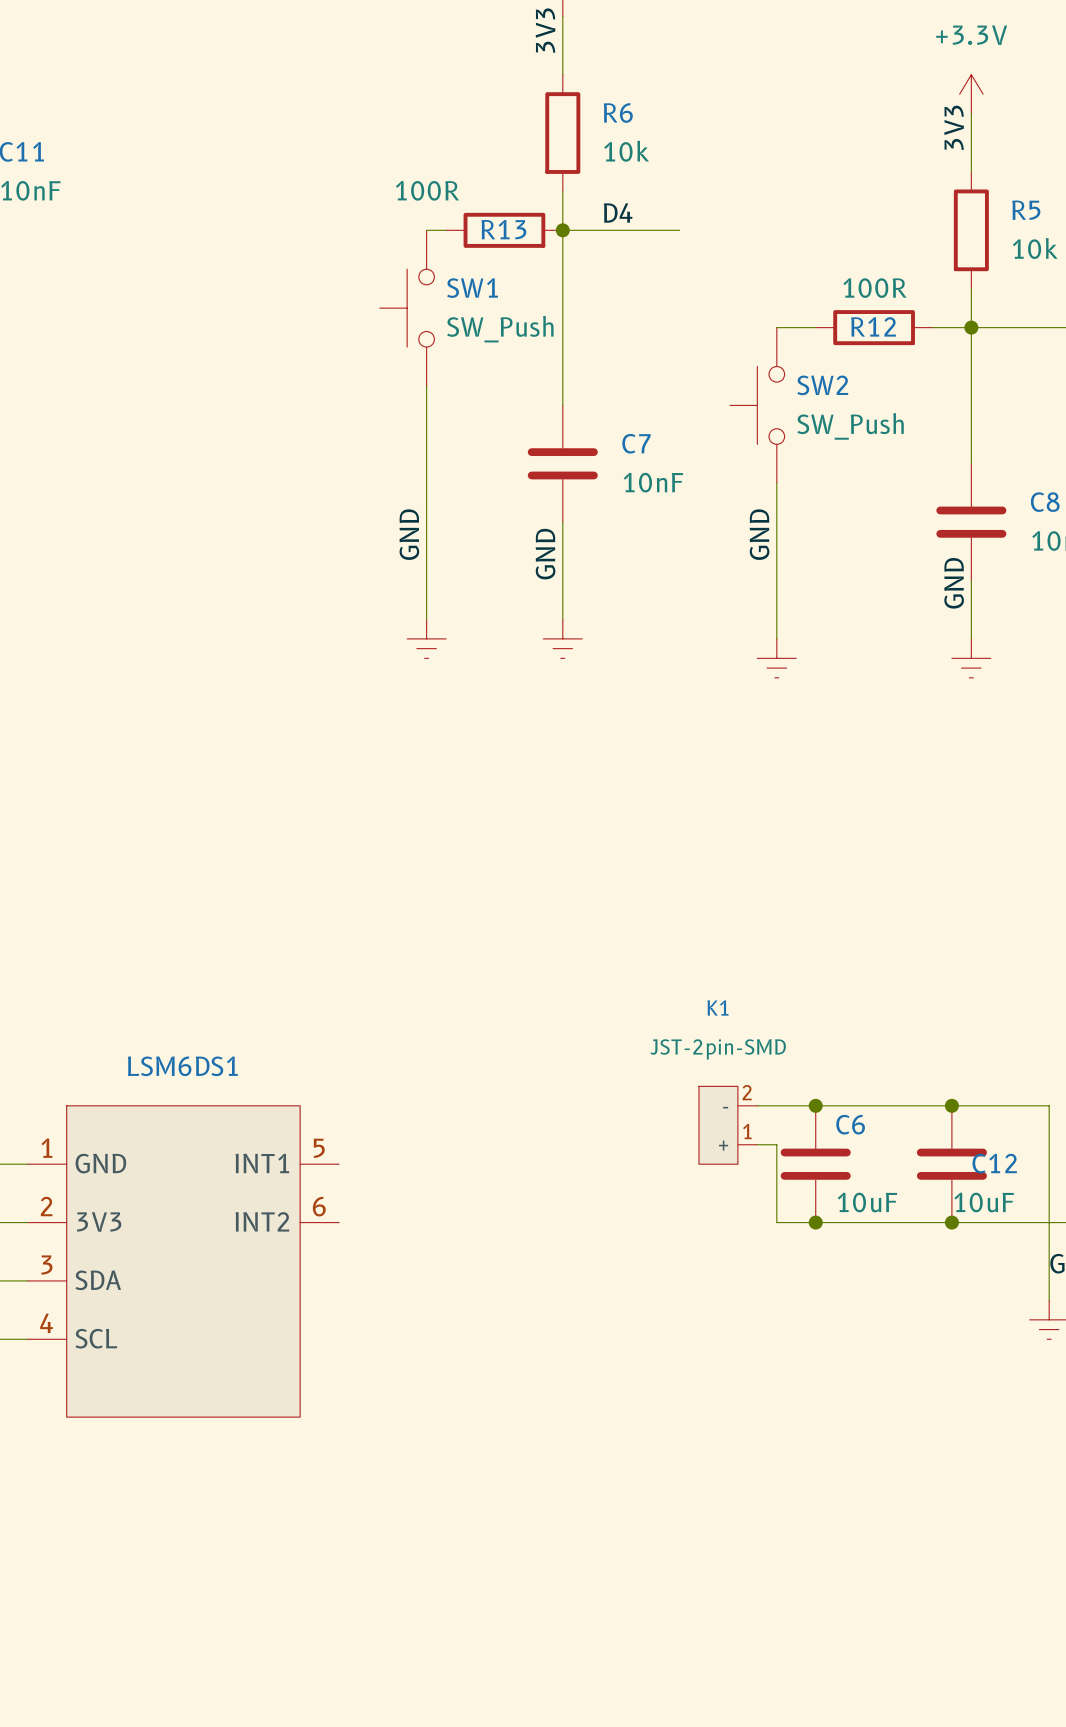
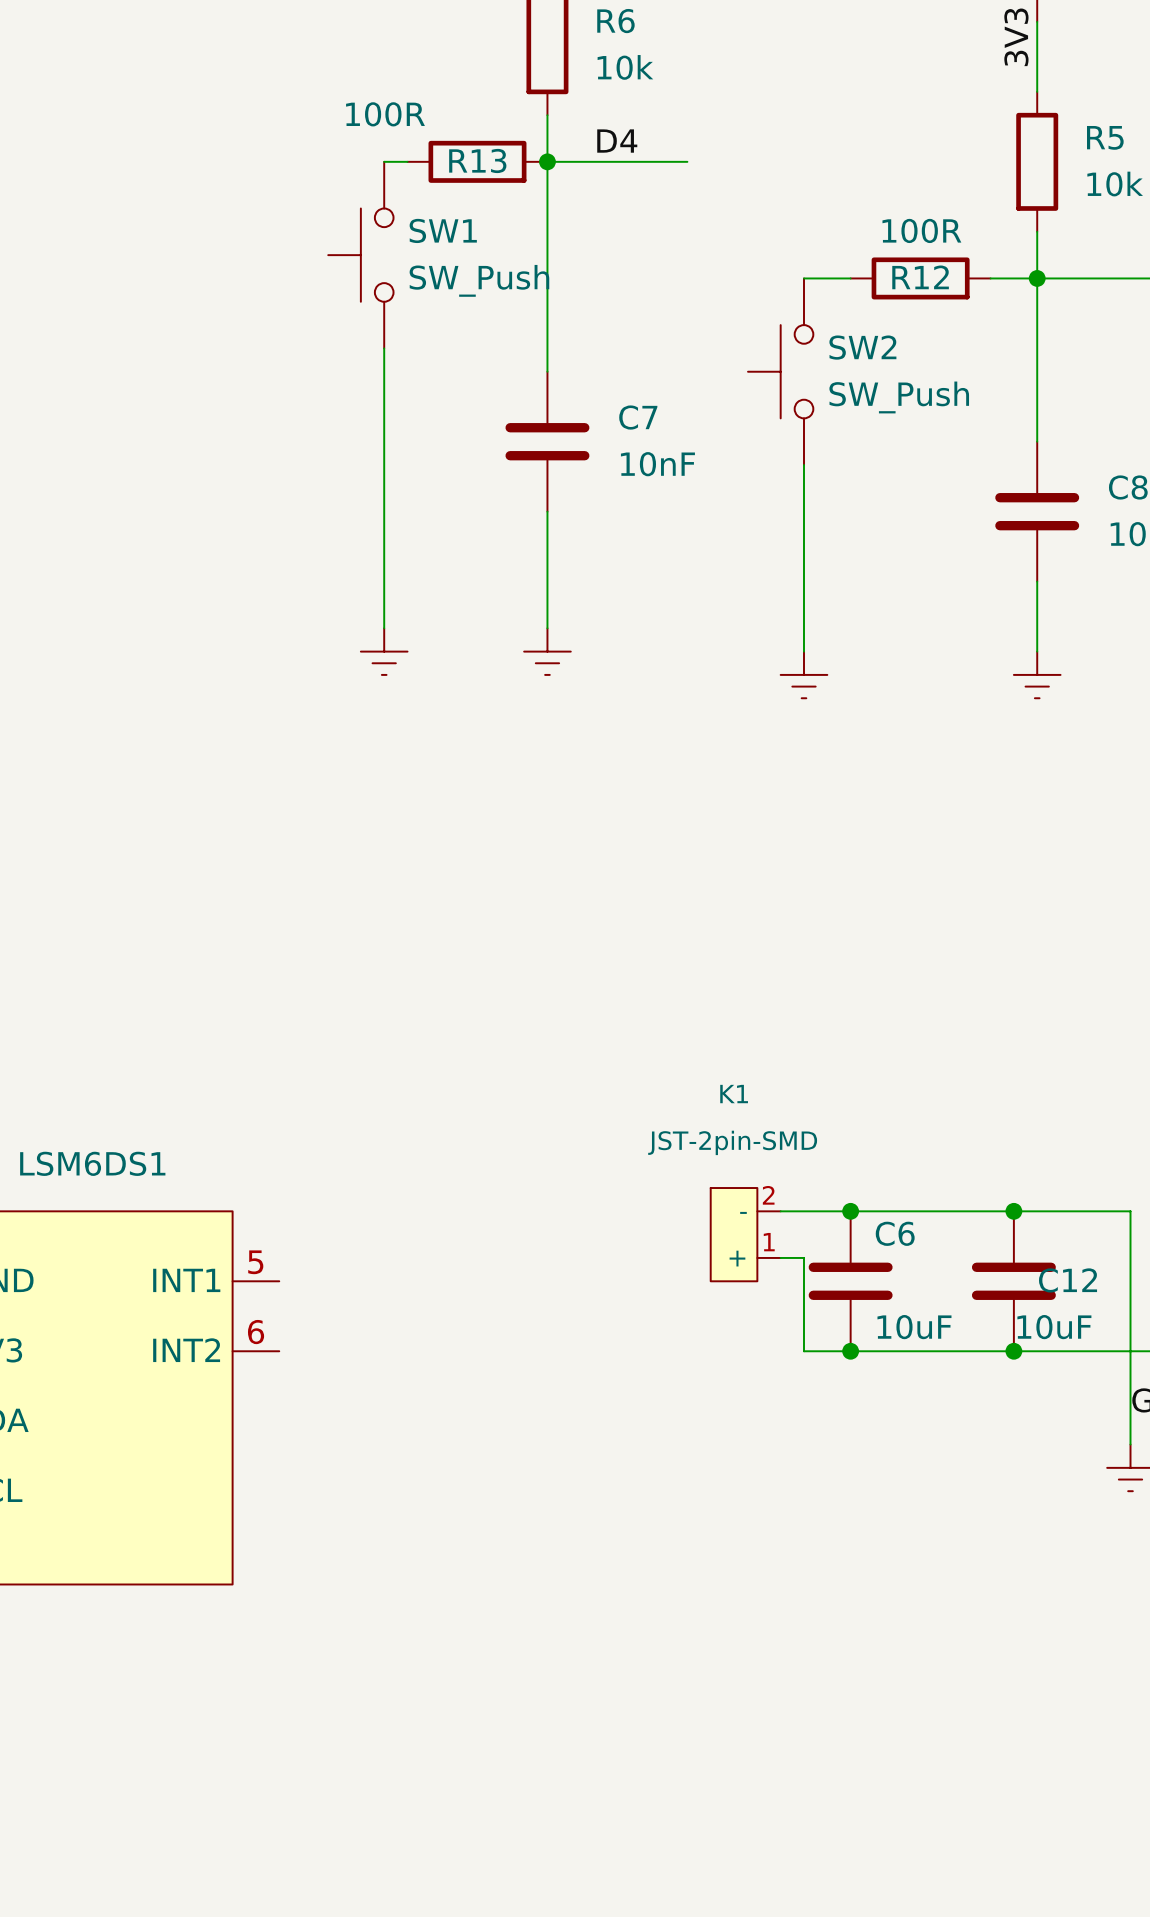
label: GND (409, 534) -> none
label: GND (759, 534) -> none
label: GND (545, 554) -> none
label: GND (954, 583) -> none

